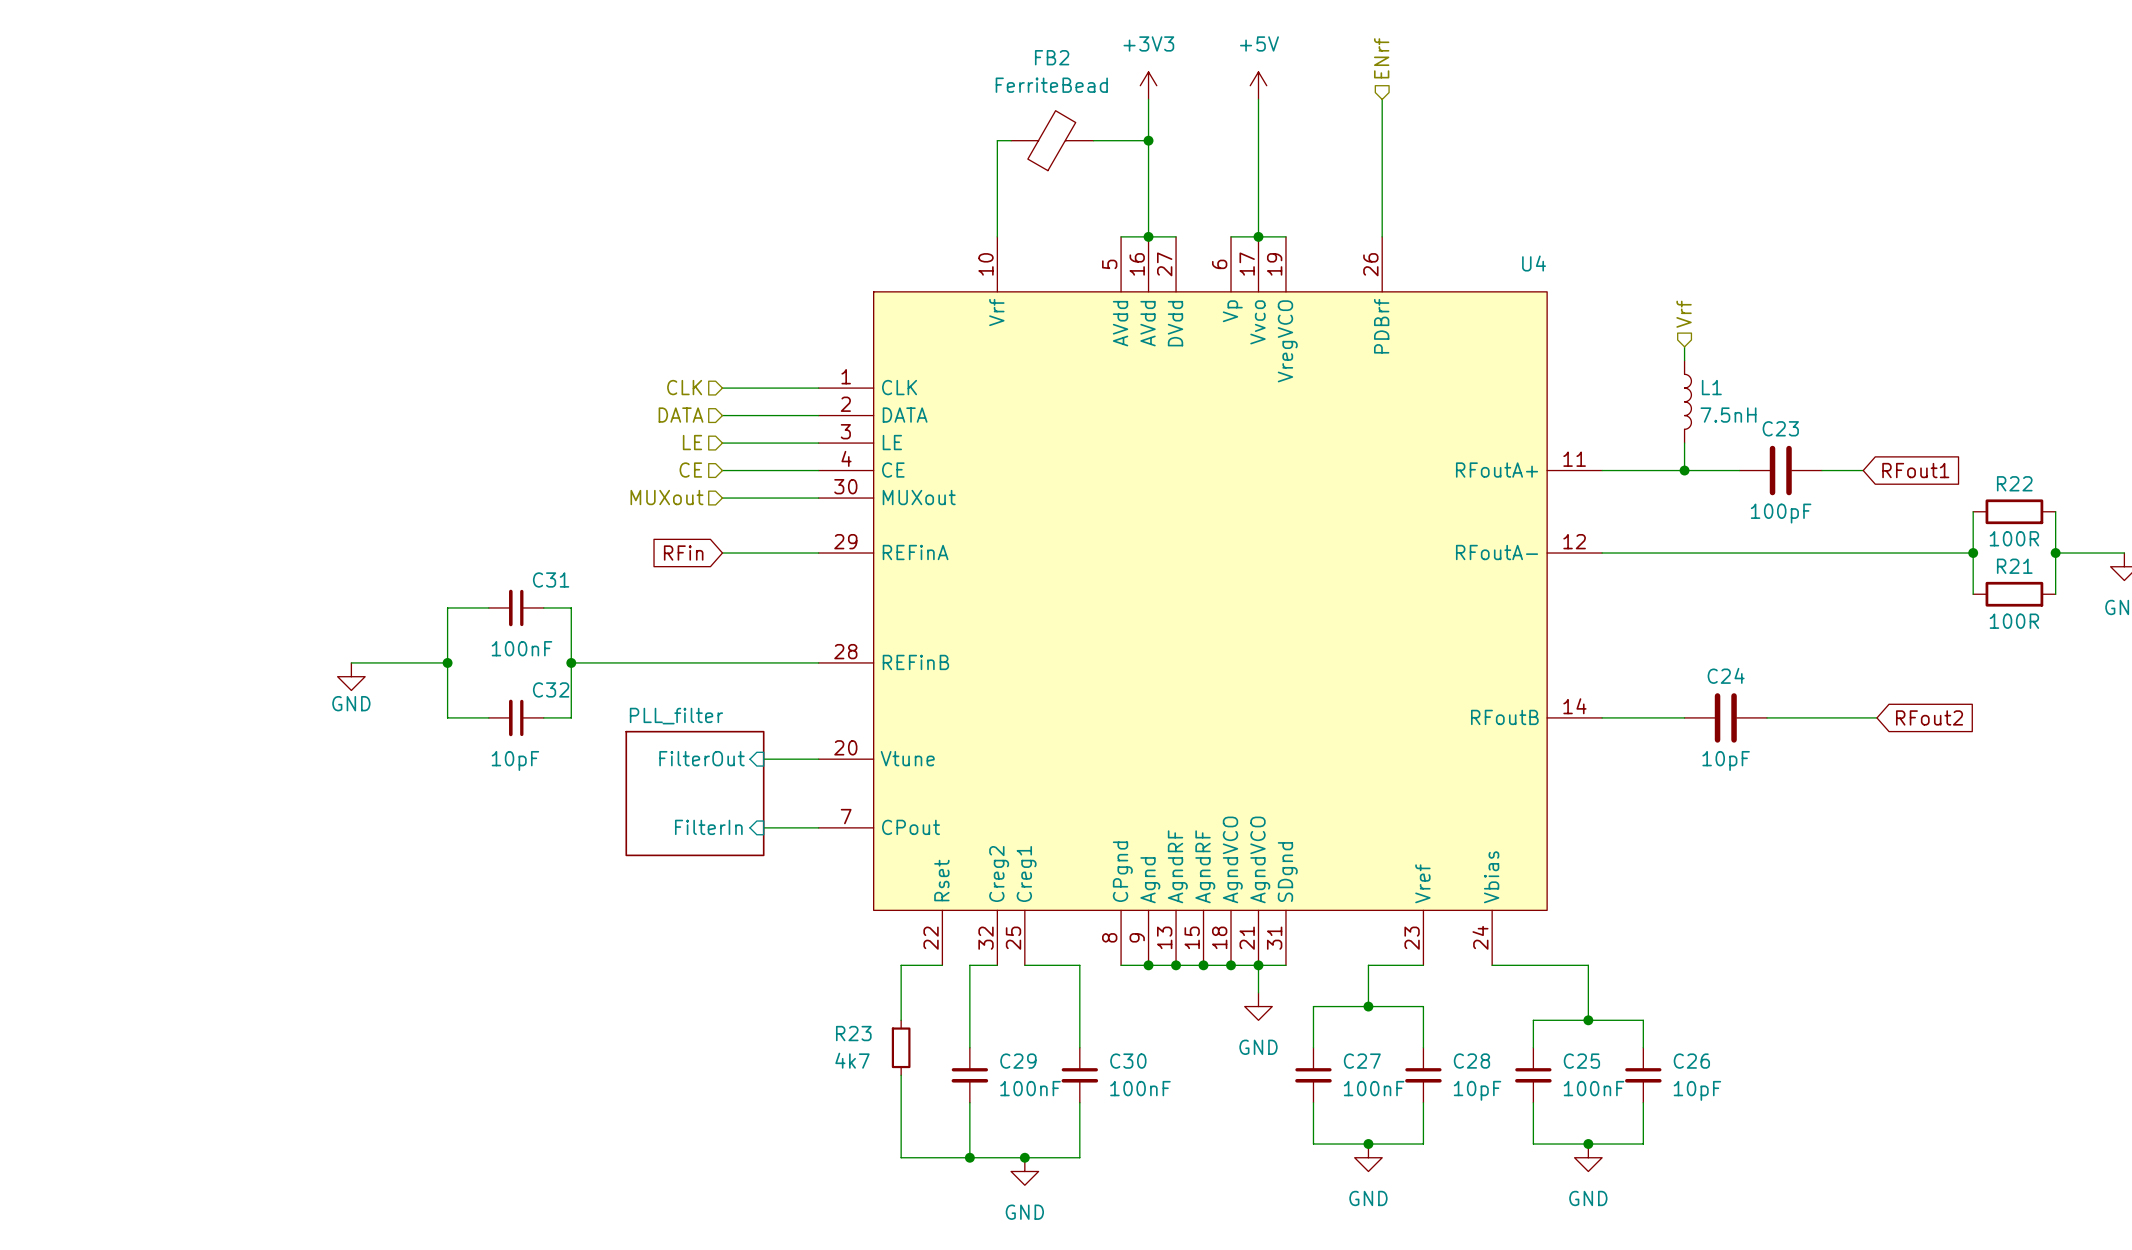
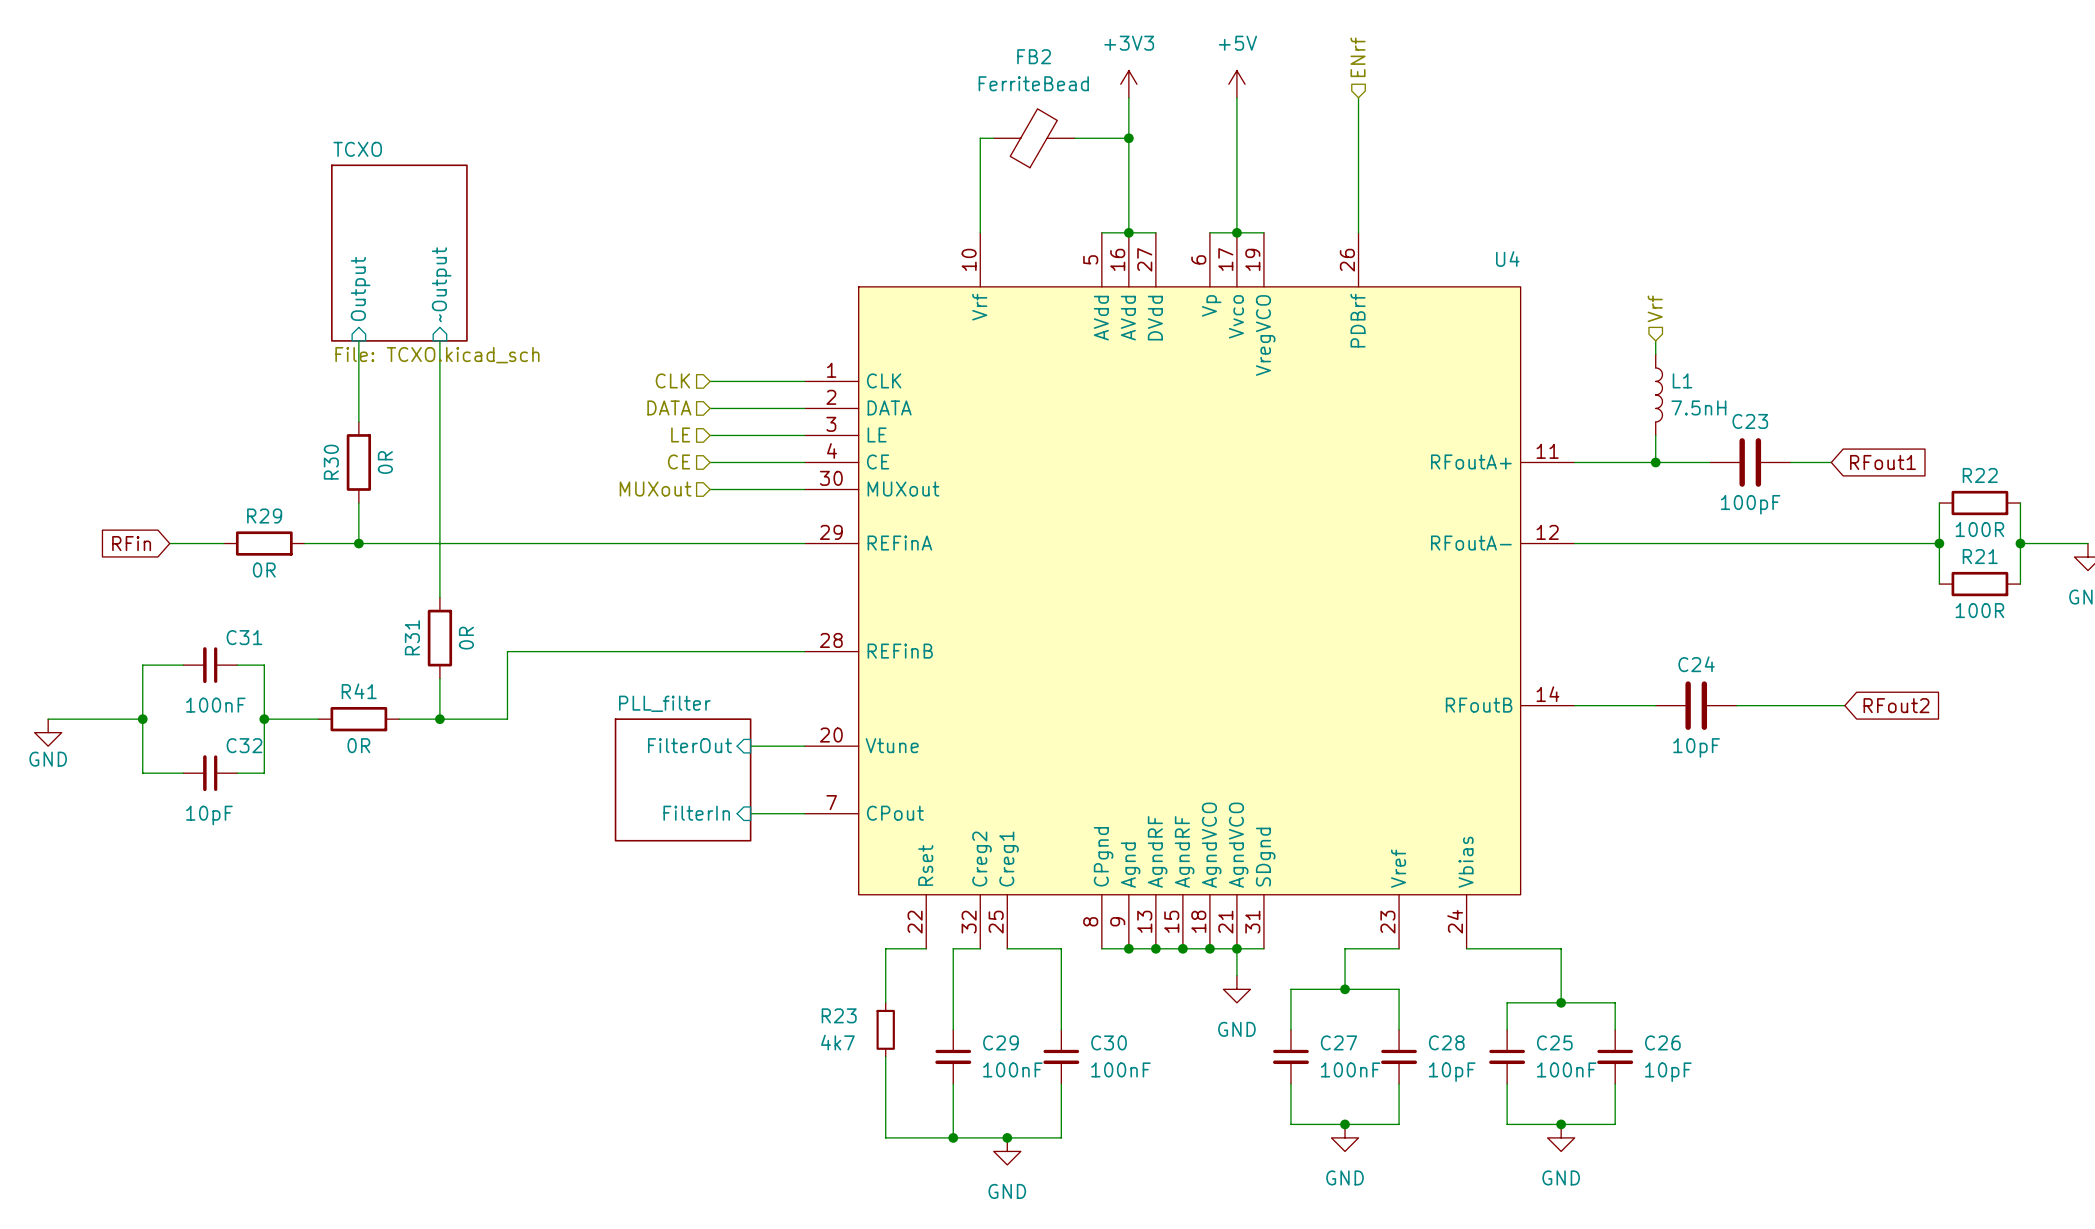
sheet TCXO: none -> File: TCXO.kicad_sch (399, 253)
sheet pin: none -> ~Output (441, 284)
sheet pin: none -> Output (360, 288)
wire: none -> (358, 340) (358, 421)
wire: none -> (439, 340) (439, 597)
R30: none -> 0R (358, 462)
wire: none -> (358, 503) (358, 543)
global label: none -> RFin (131, 543)
wire: none -> (169, 543) (223, 543)
R29: none -> 0R (264, 543)
wire: none -> (304, 543) (710, 543)
junction: none -> (358, 543)
global label: RFin (683, 553) -> none
wire: (488, 607) (447, 607) (447, 690) -> none
C31 position: (516, 607) -> (210, 665)
wire: (543, 607) (571, 607) (571, 717) (543, 717) -> none
R31: none -> 0R (439, 638)
wire: (351, 662) (447, 662) -> none
junction: (447, 662) -> none
wire: none -> (561, 651) (507, 651) (507, 719) (399, 719)
junction: (571, 662) -> none
wire: none -> (183, 665) (142, 665) (142, 773) (183, 773)
wire: none -> (237, 665) (264, 665) (264, 773) (237, 773)
power symbol: GND (351, 676) -> none
wire: (447, 717) (488, 717) -> (439, 705) (439, 719)
C32 position: (516, 717) -> (210, 773)
wire: none -> (48, 719) (142, 719)
junction: none -> (142, 719)
wire: none -> (264, 719) (318, 719)
junction: none -> (264, 719)
R41: none -> 0R (358, 719)
junction: none -> (439, 719)
power symbol: none -> GND (48, 732)

